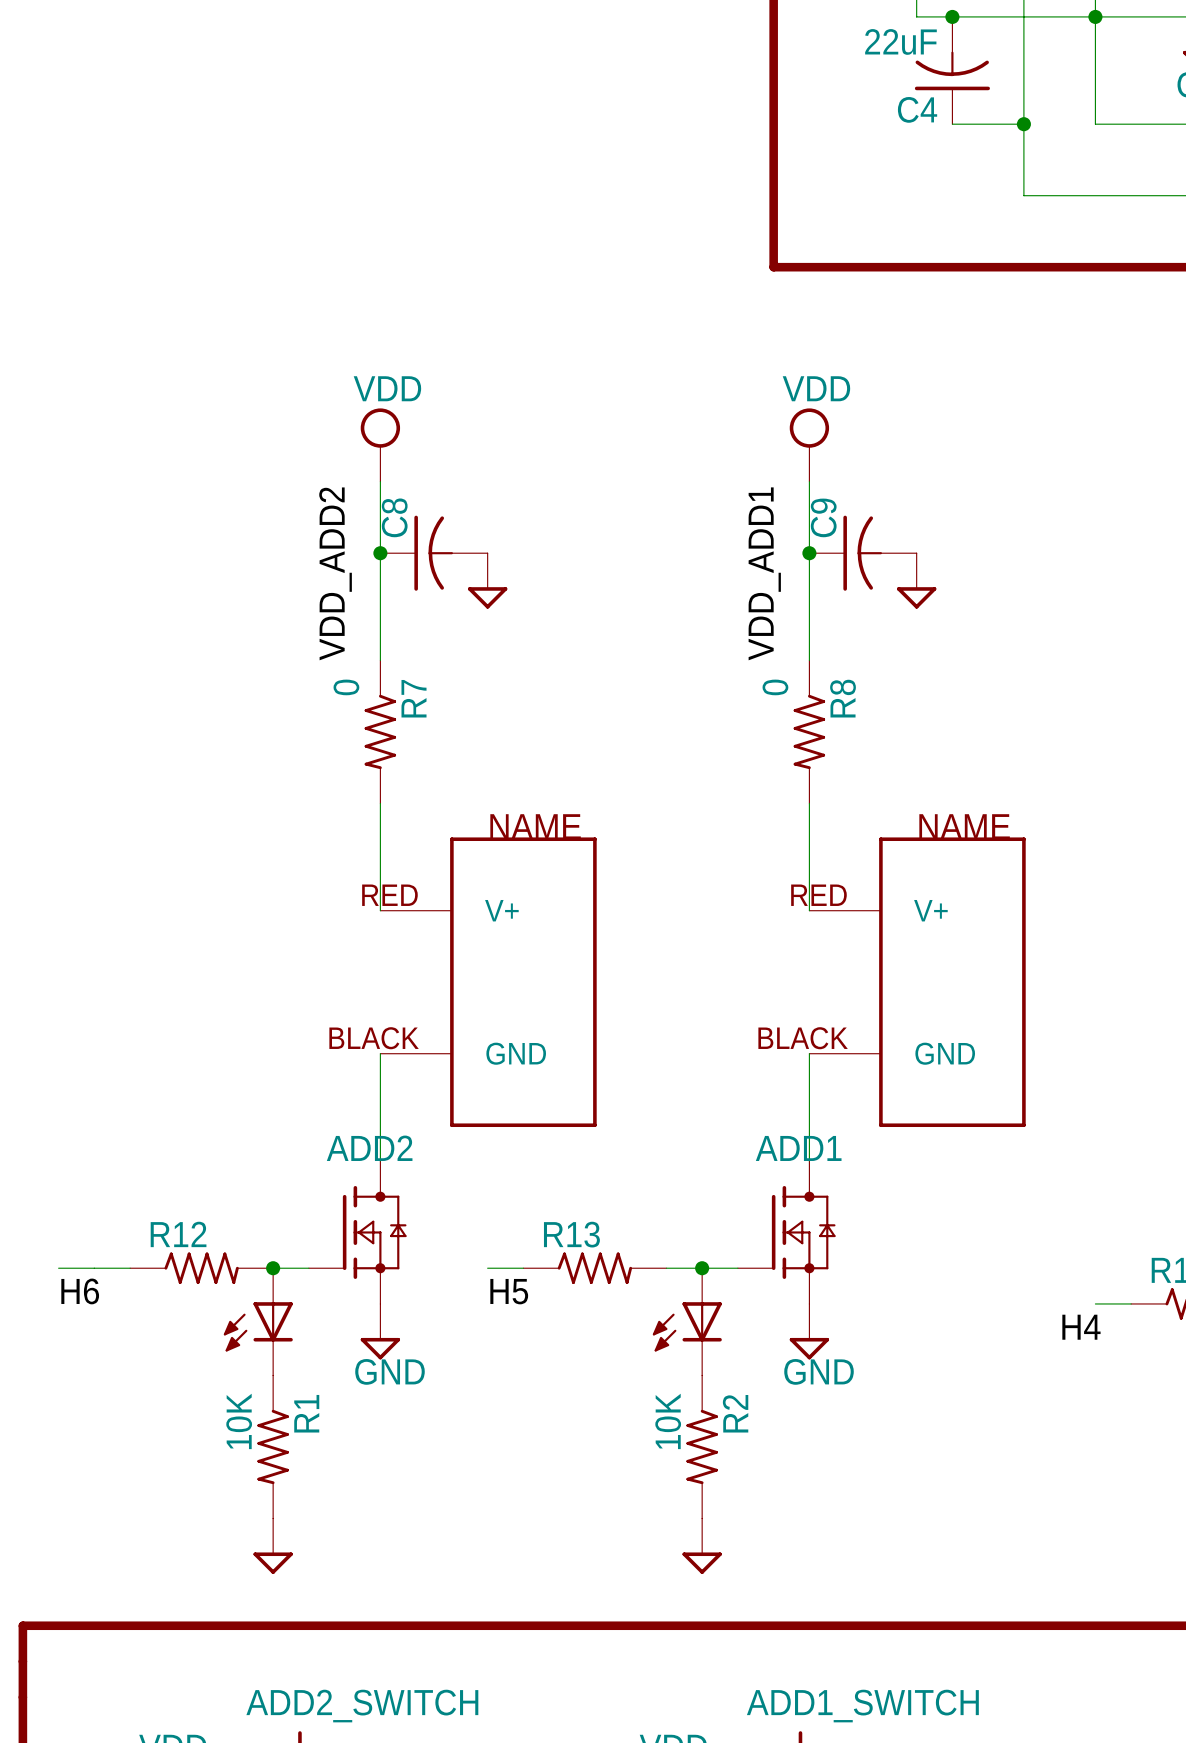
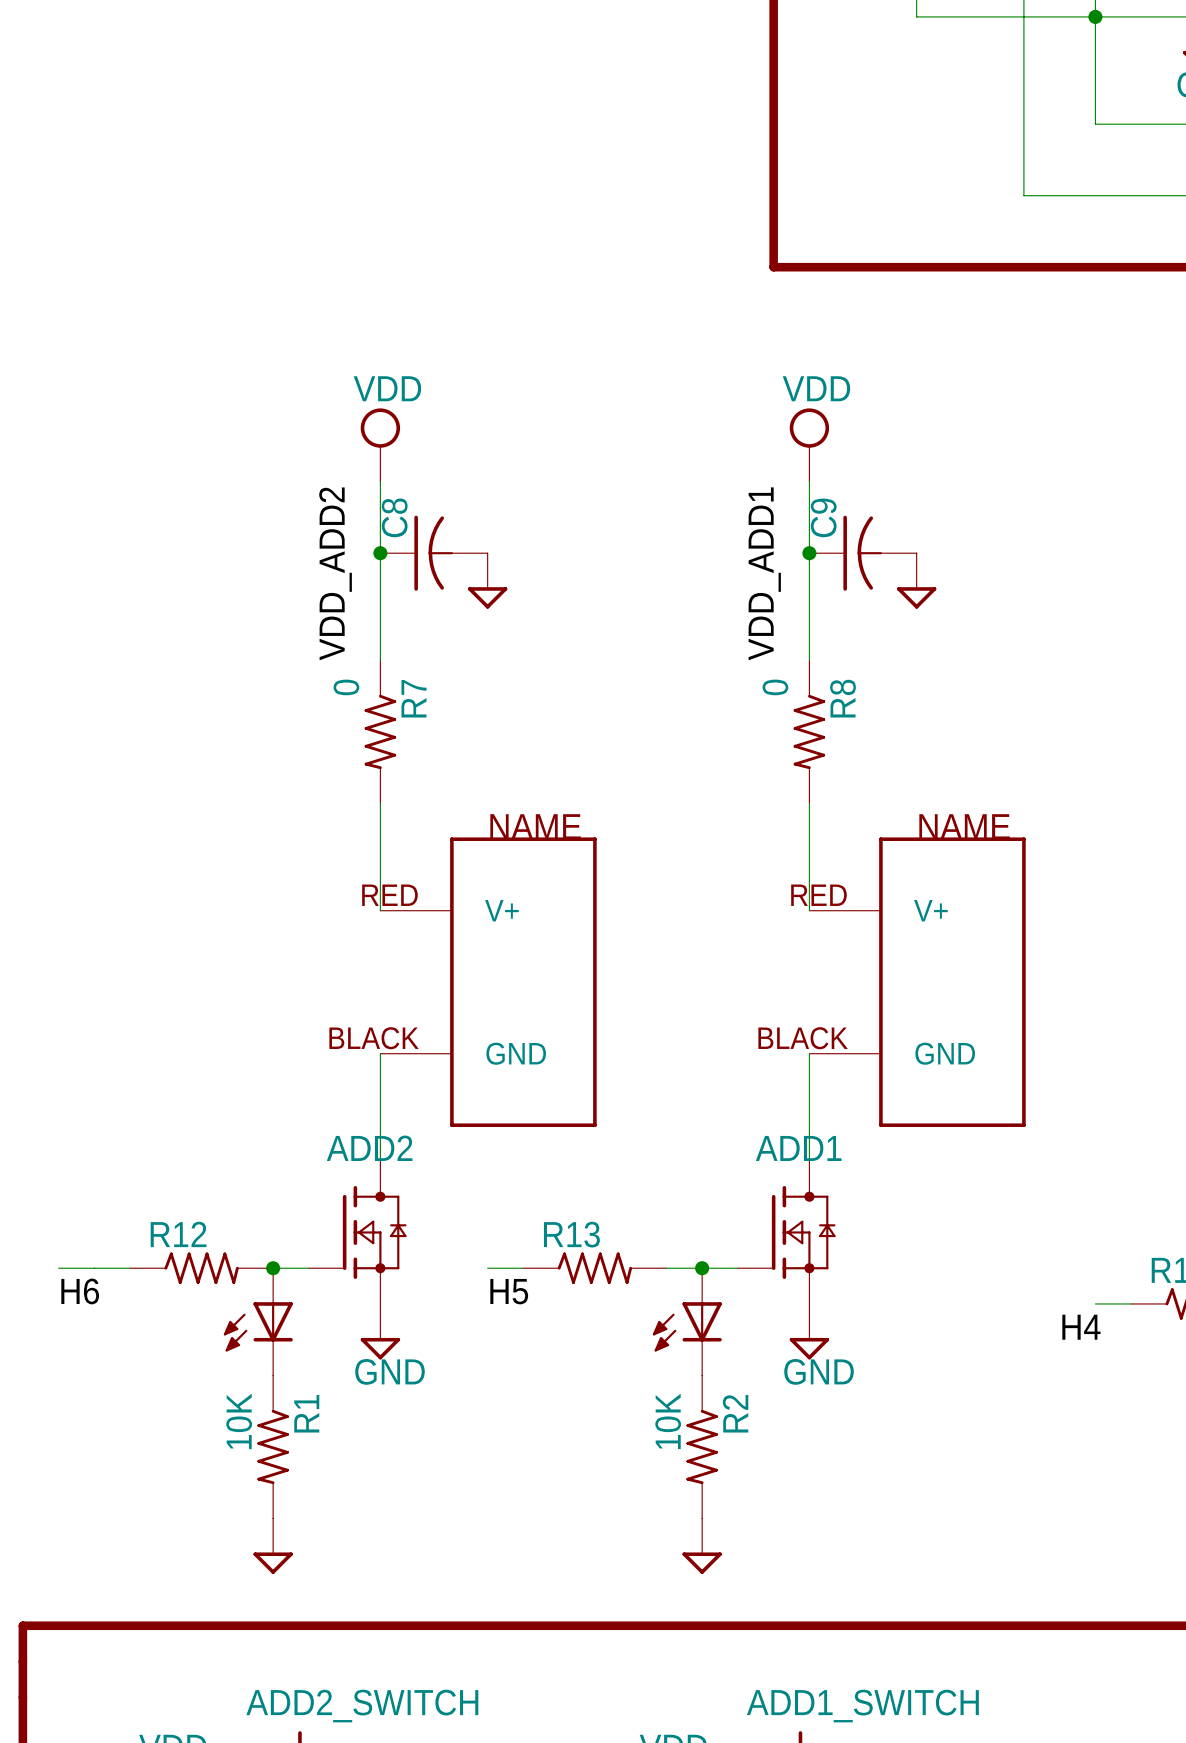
junction: (952, 16) -> none
C4: 22uF (952, 70) -> none
wire: (952, 124) (1023, 124) -> none
junction: (1023, 124) -> none

